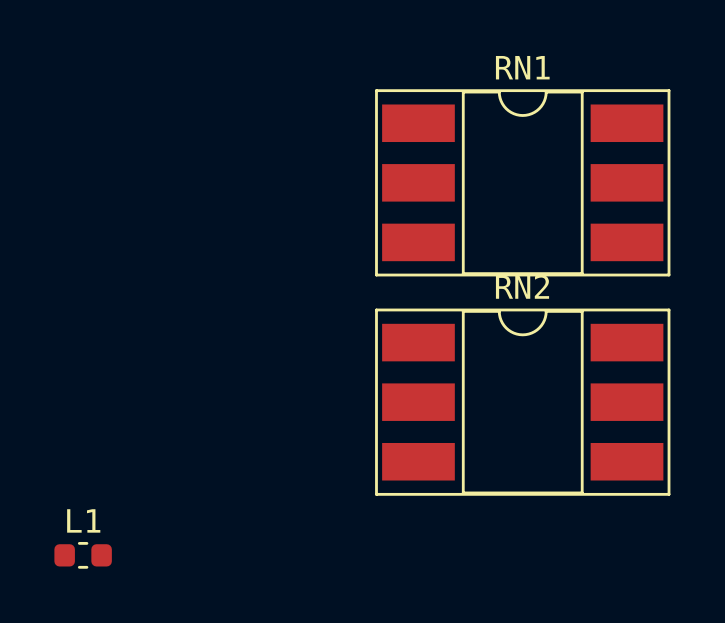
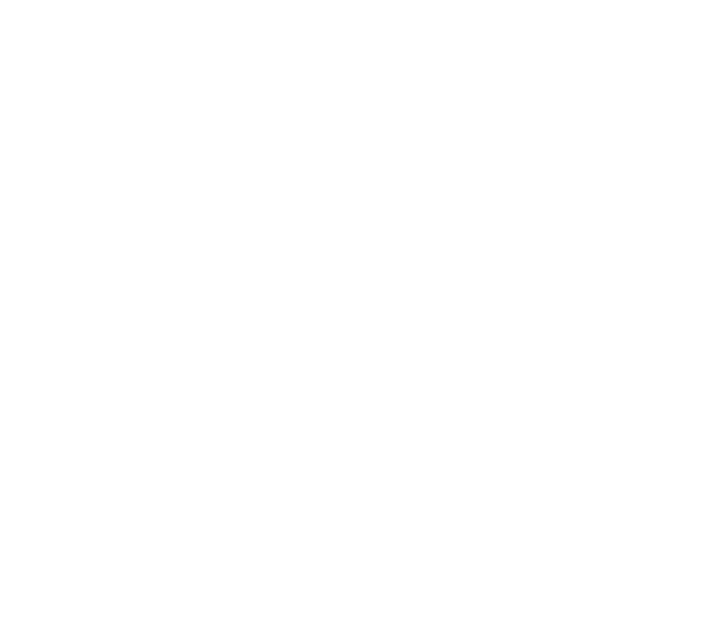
RN1: (522, 182) -> none
RN2: (522, 402) -> none
L1: (83, 555) -> none

